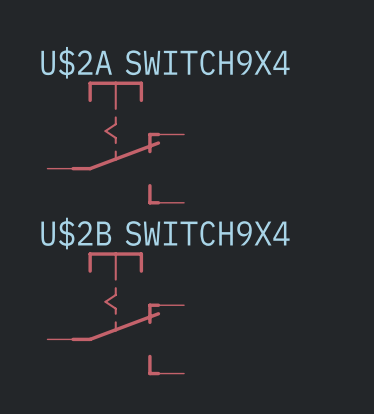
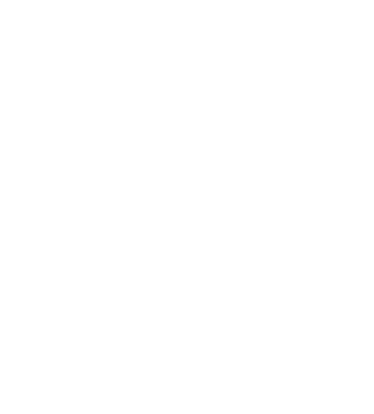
U$2A: SWITCH9X4 (115, 143) -> none
U$2B: SWITCH9X4 (115, 313) -> none

